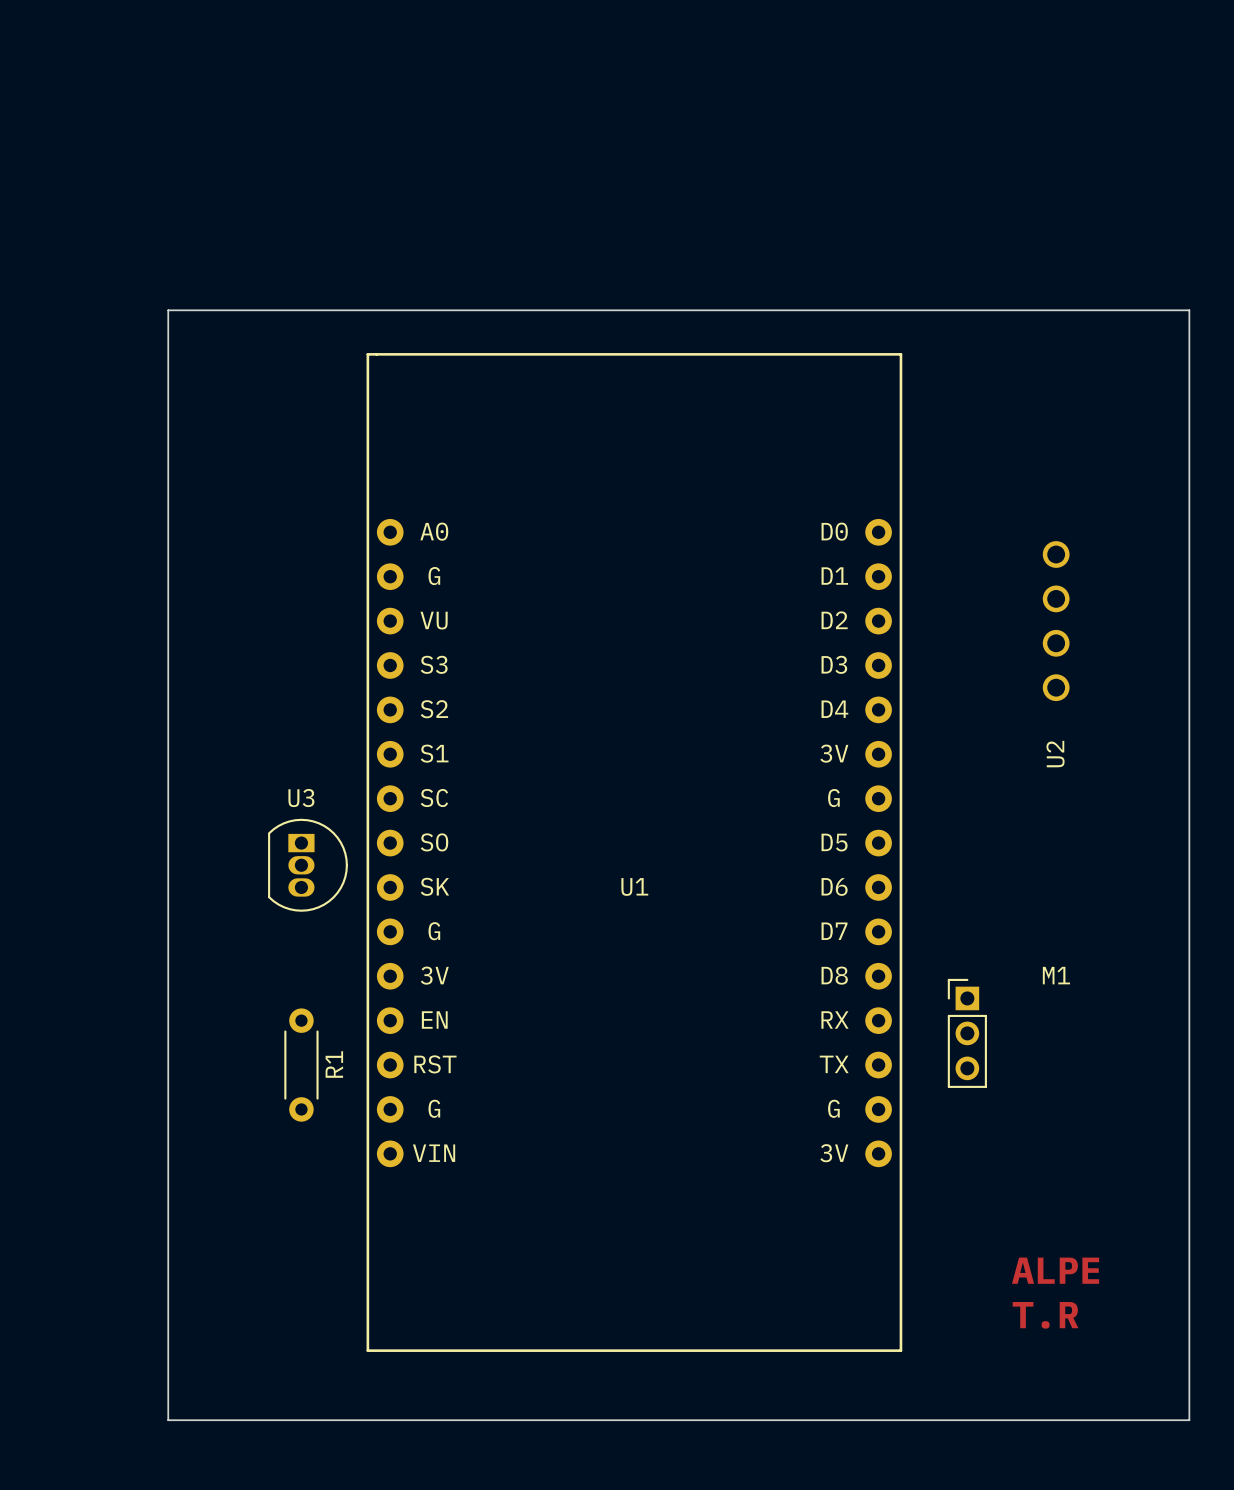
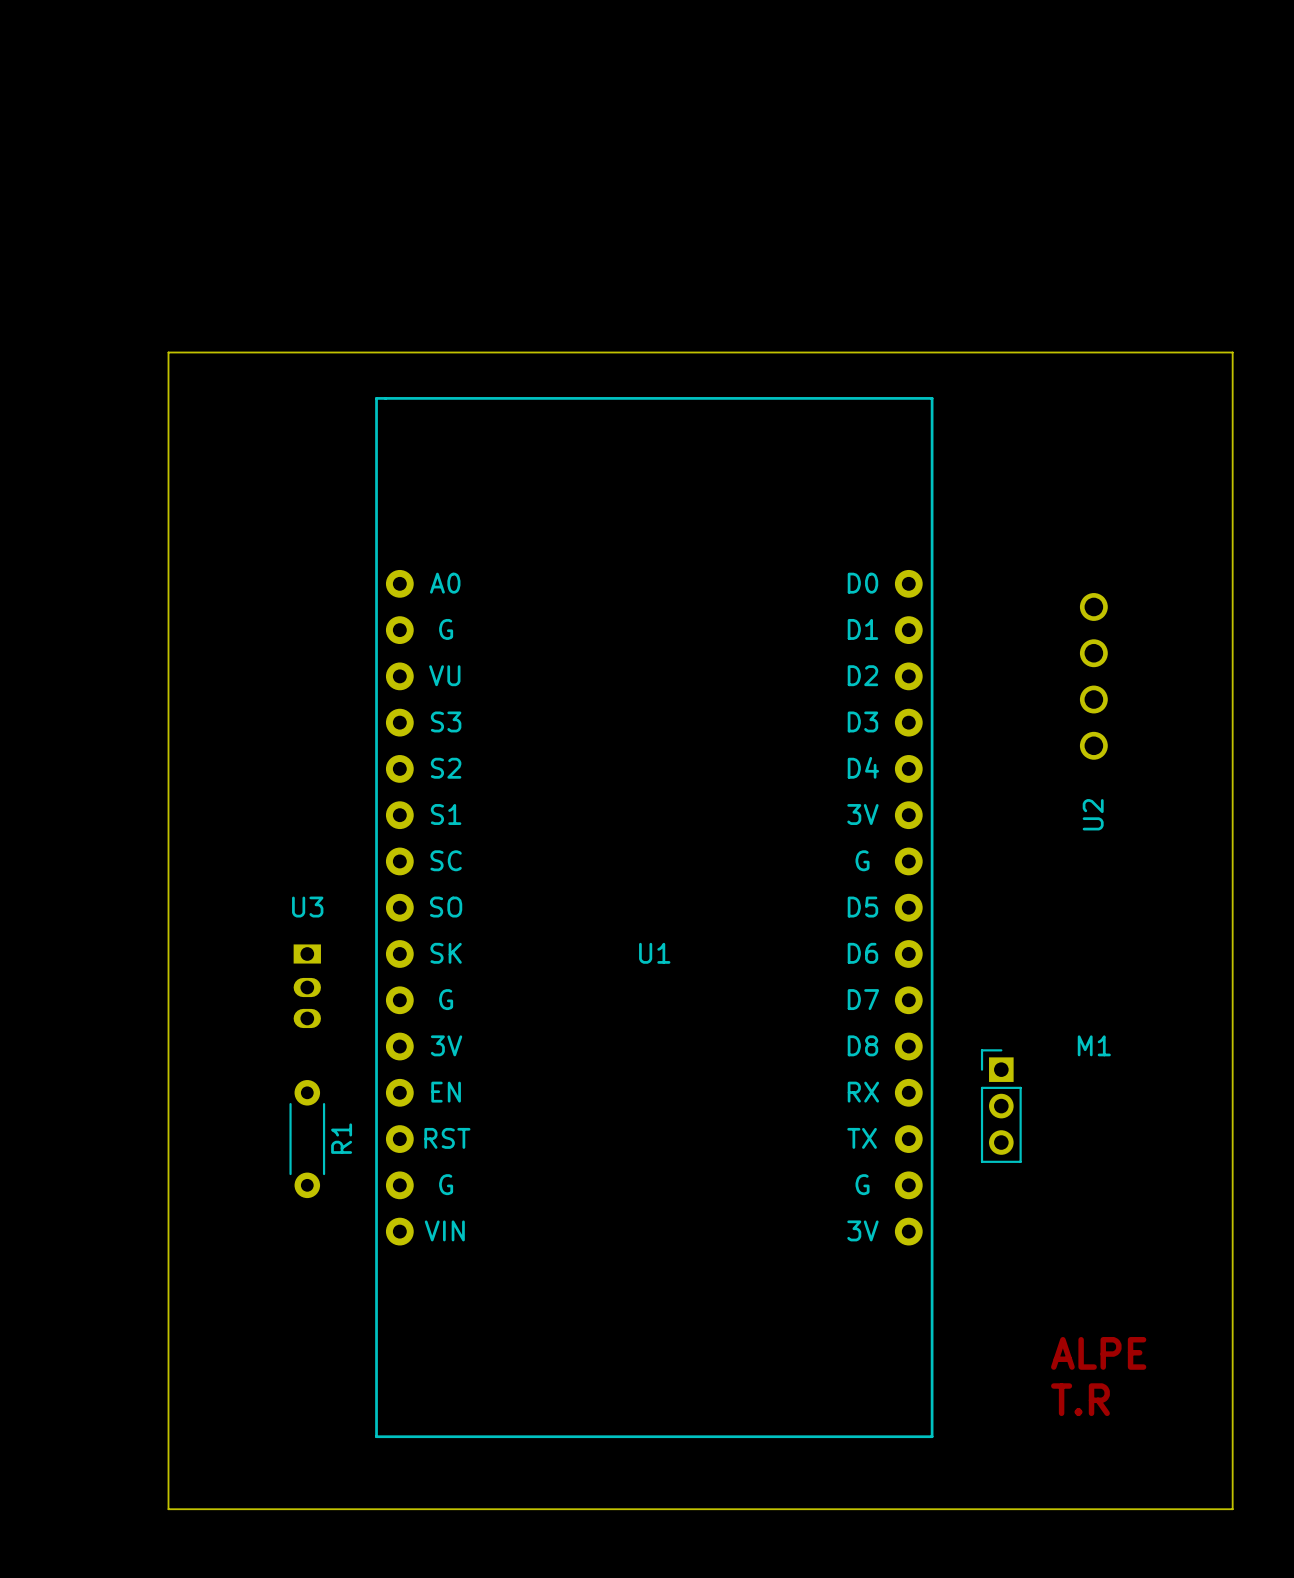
U3 footprint: [268, 818, 348, 912] -> [293, 944, 321, 1029]

